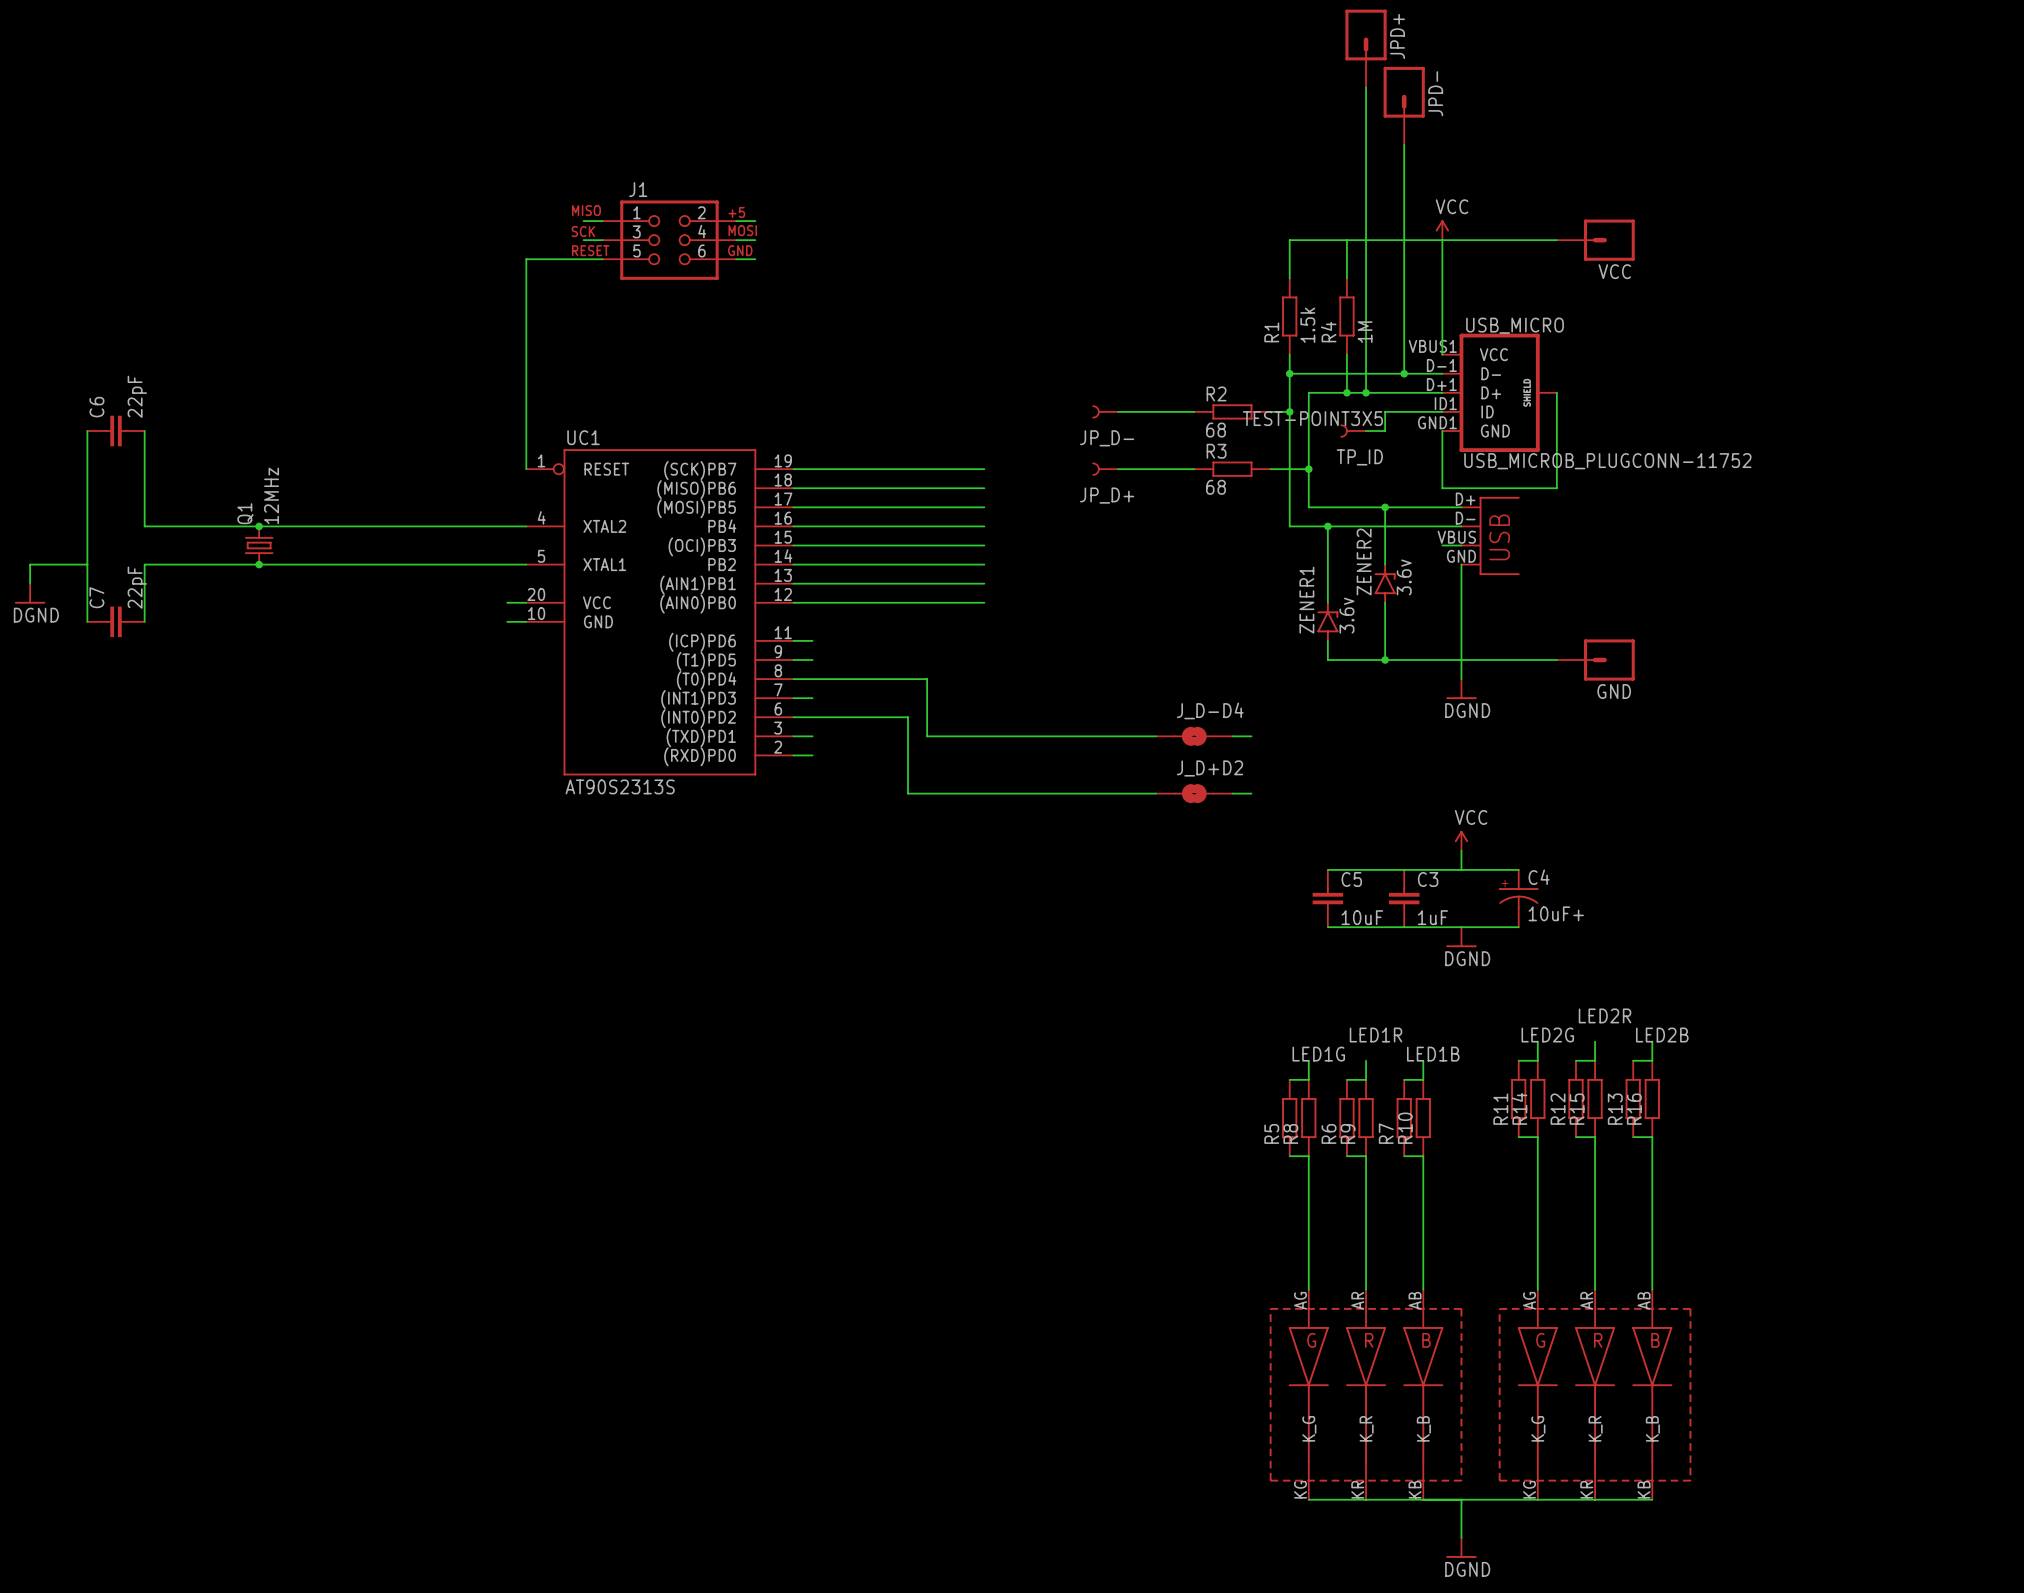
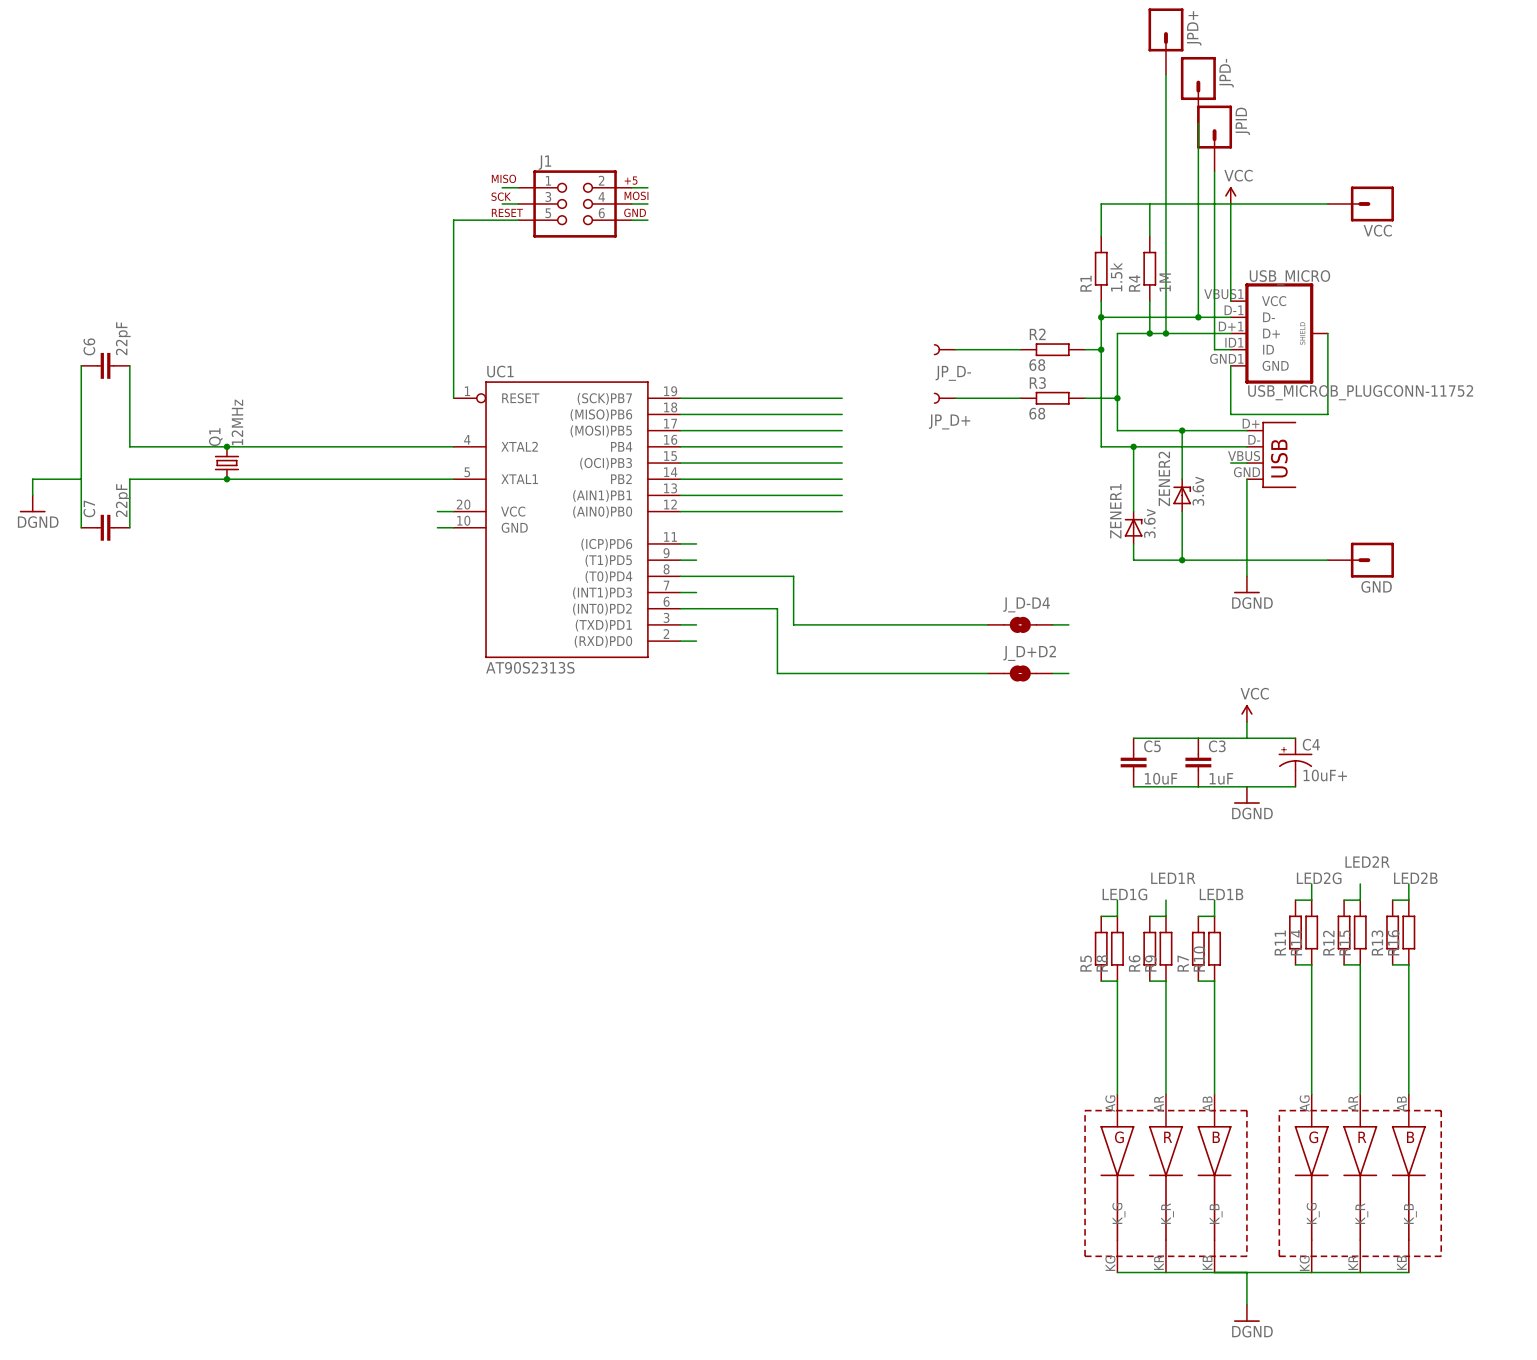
JPID: none -> (1214, 138)
wire: (1423, 411) (1385, 411) (1385, 431) (1366, 431) -> (1214, 349) (1214, 171)
TP_ID: TEST-POINT3X5 (1353, 431) -> none
ZENER2 symbol: [1374, 563, 1396, 604] -> [1173, 479, 1192, 512]
ZENER1 symbol: [1317, 601, 1339, 642] -> [1124, 511, 1143, 544]

